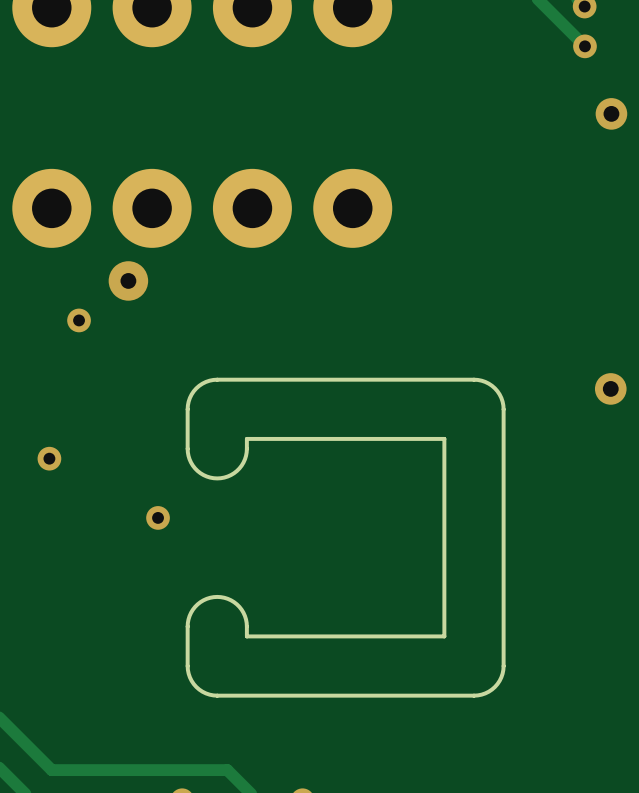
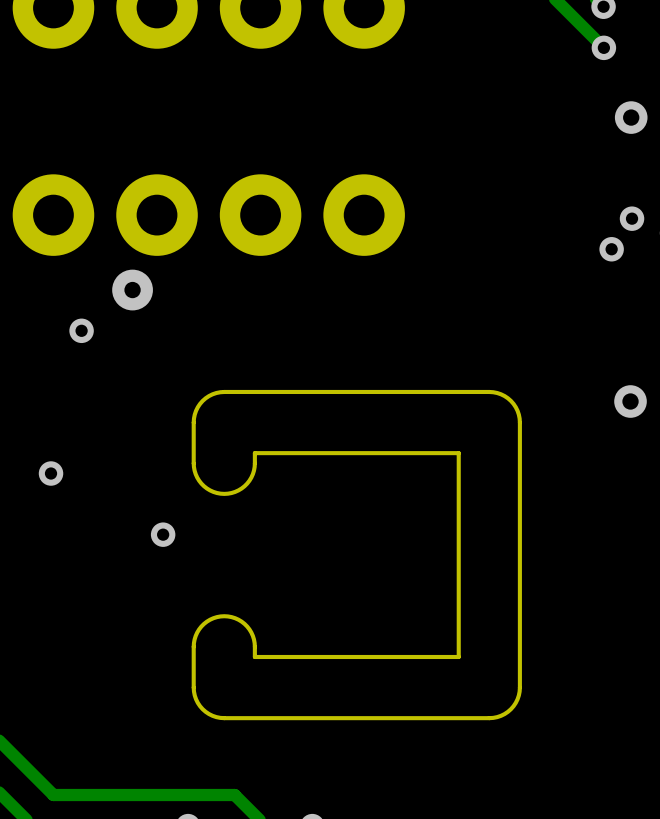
via: none -> (632, 218)
via: none -> (611, 249)

